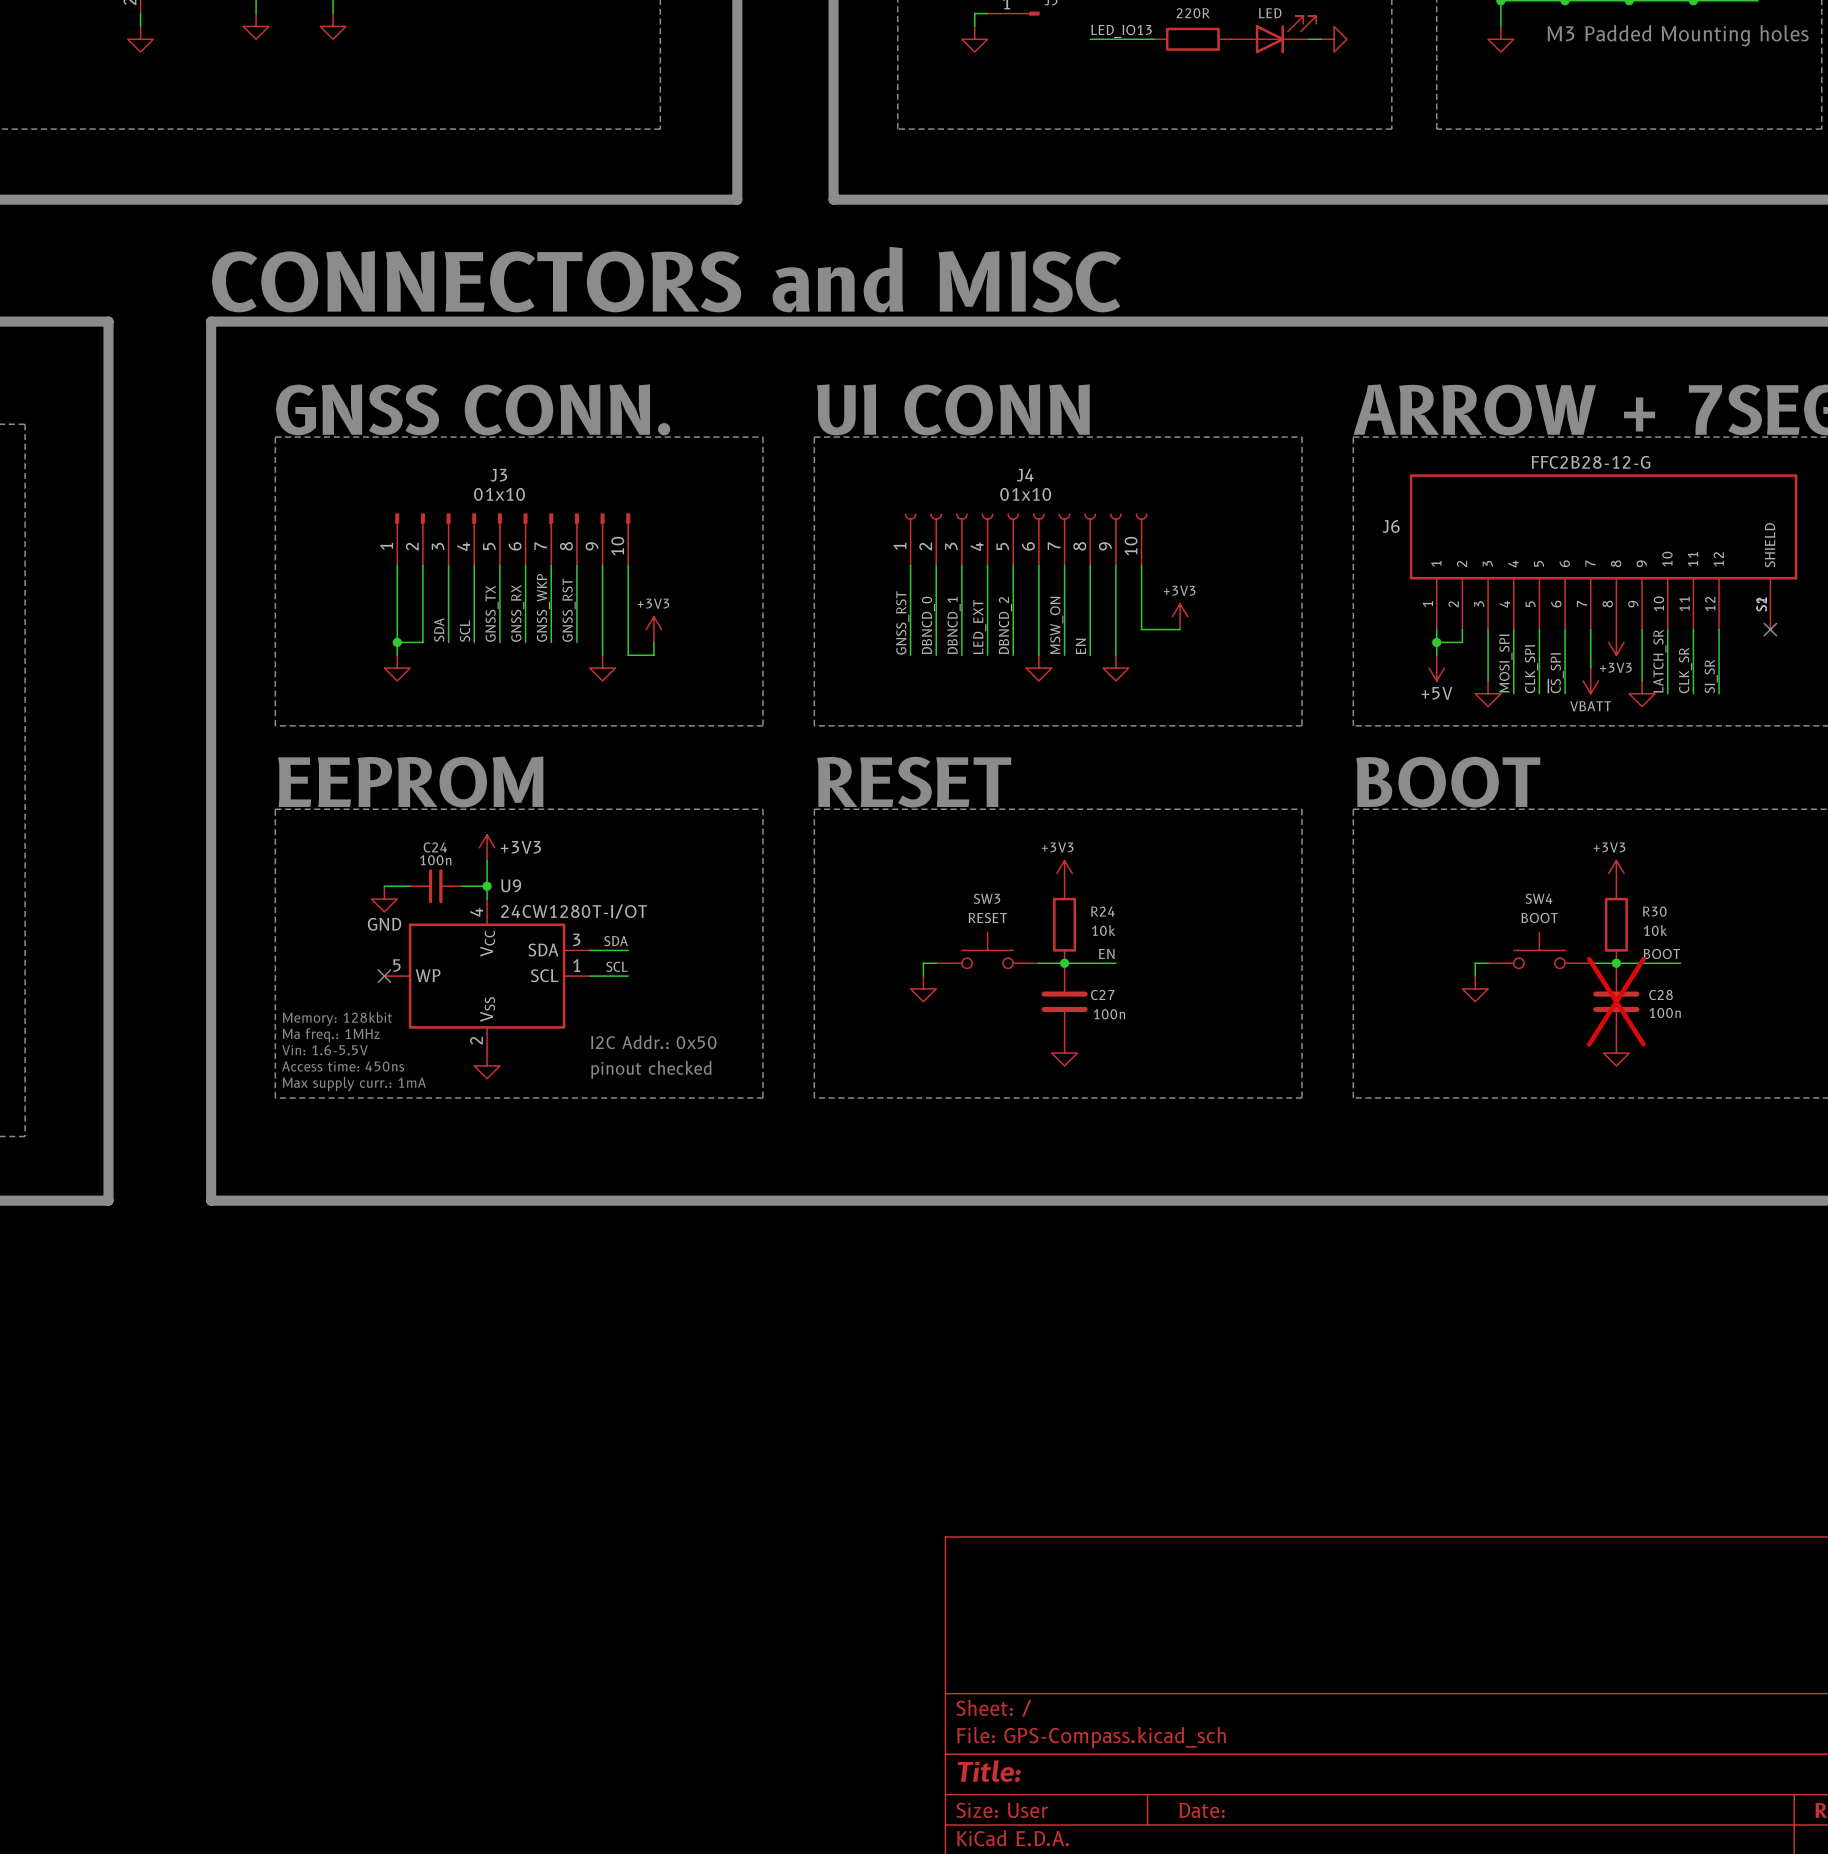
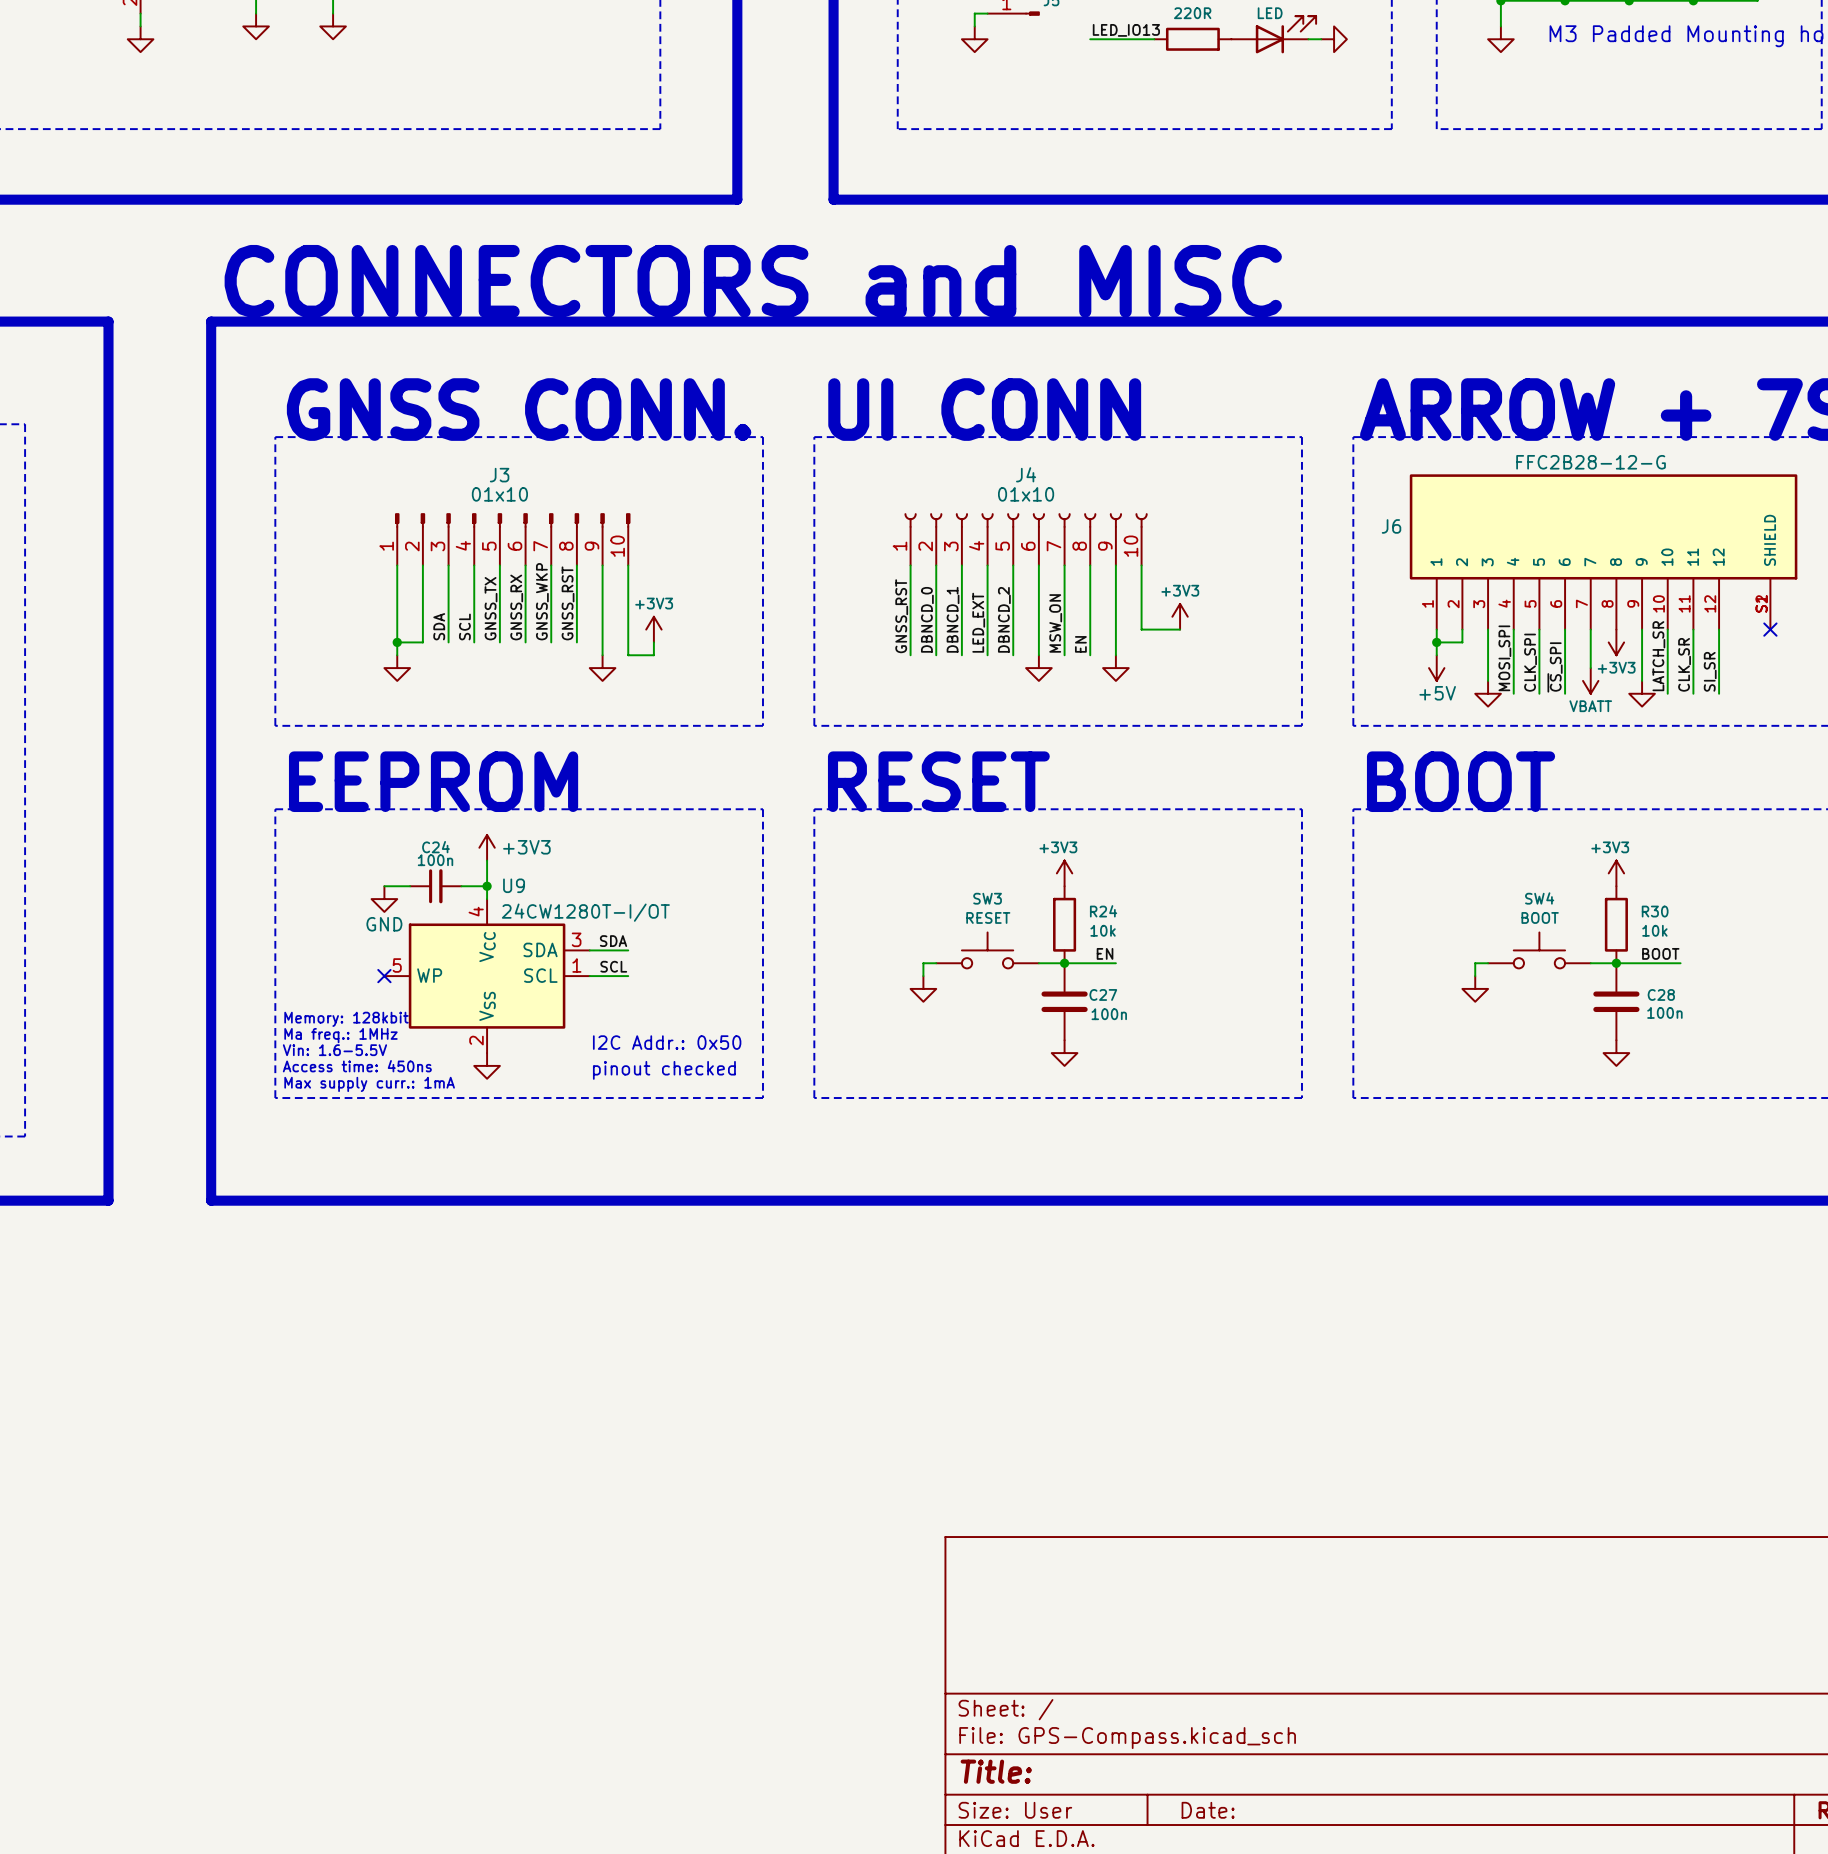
C28 do-not-place cross: (1616, 1001) -> none

